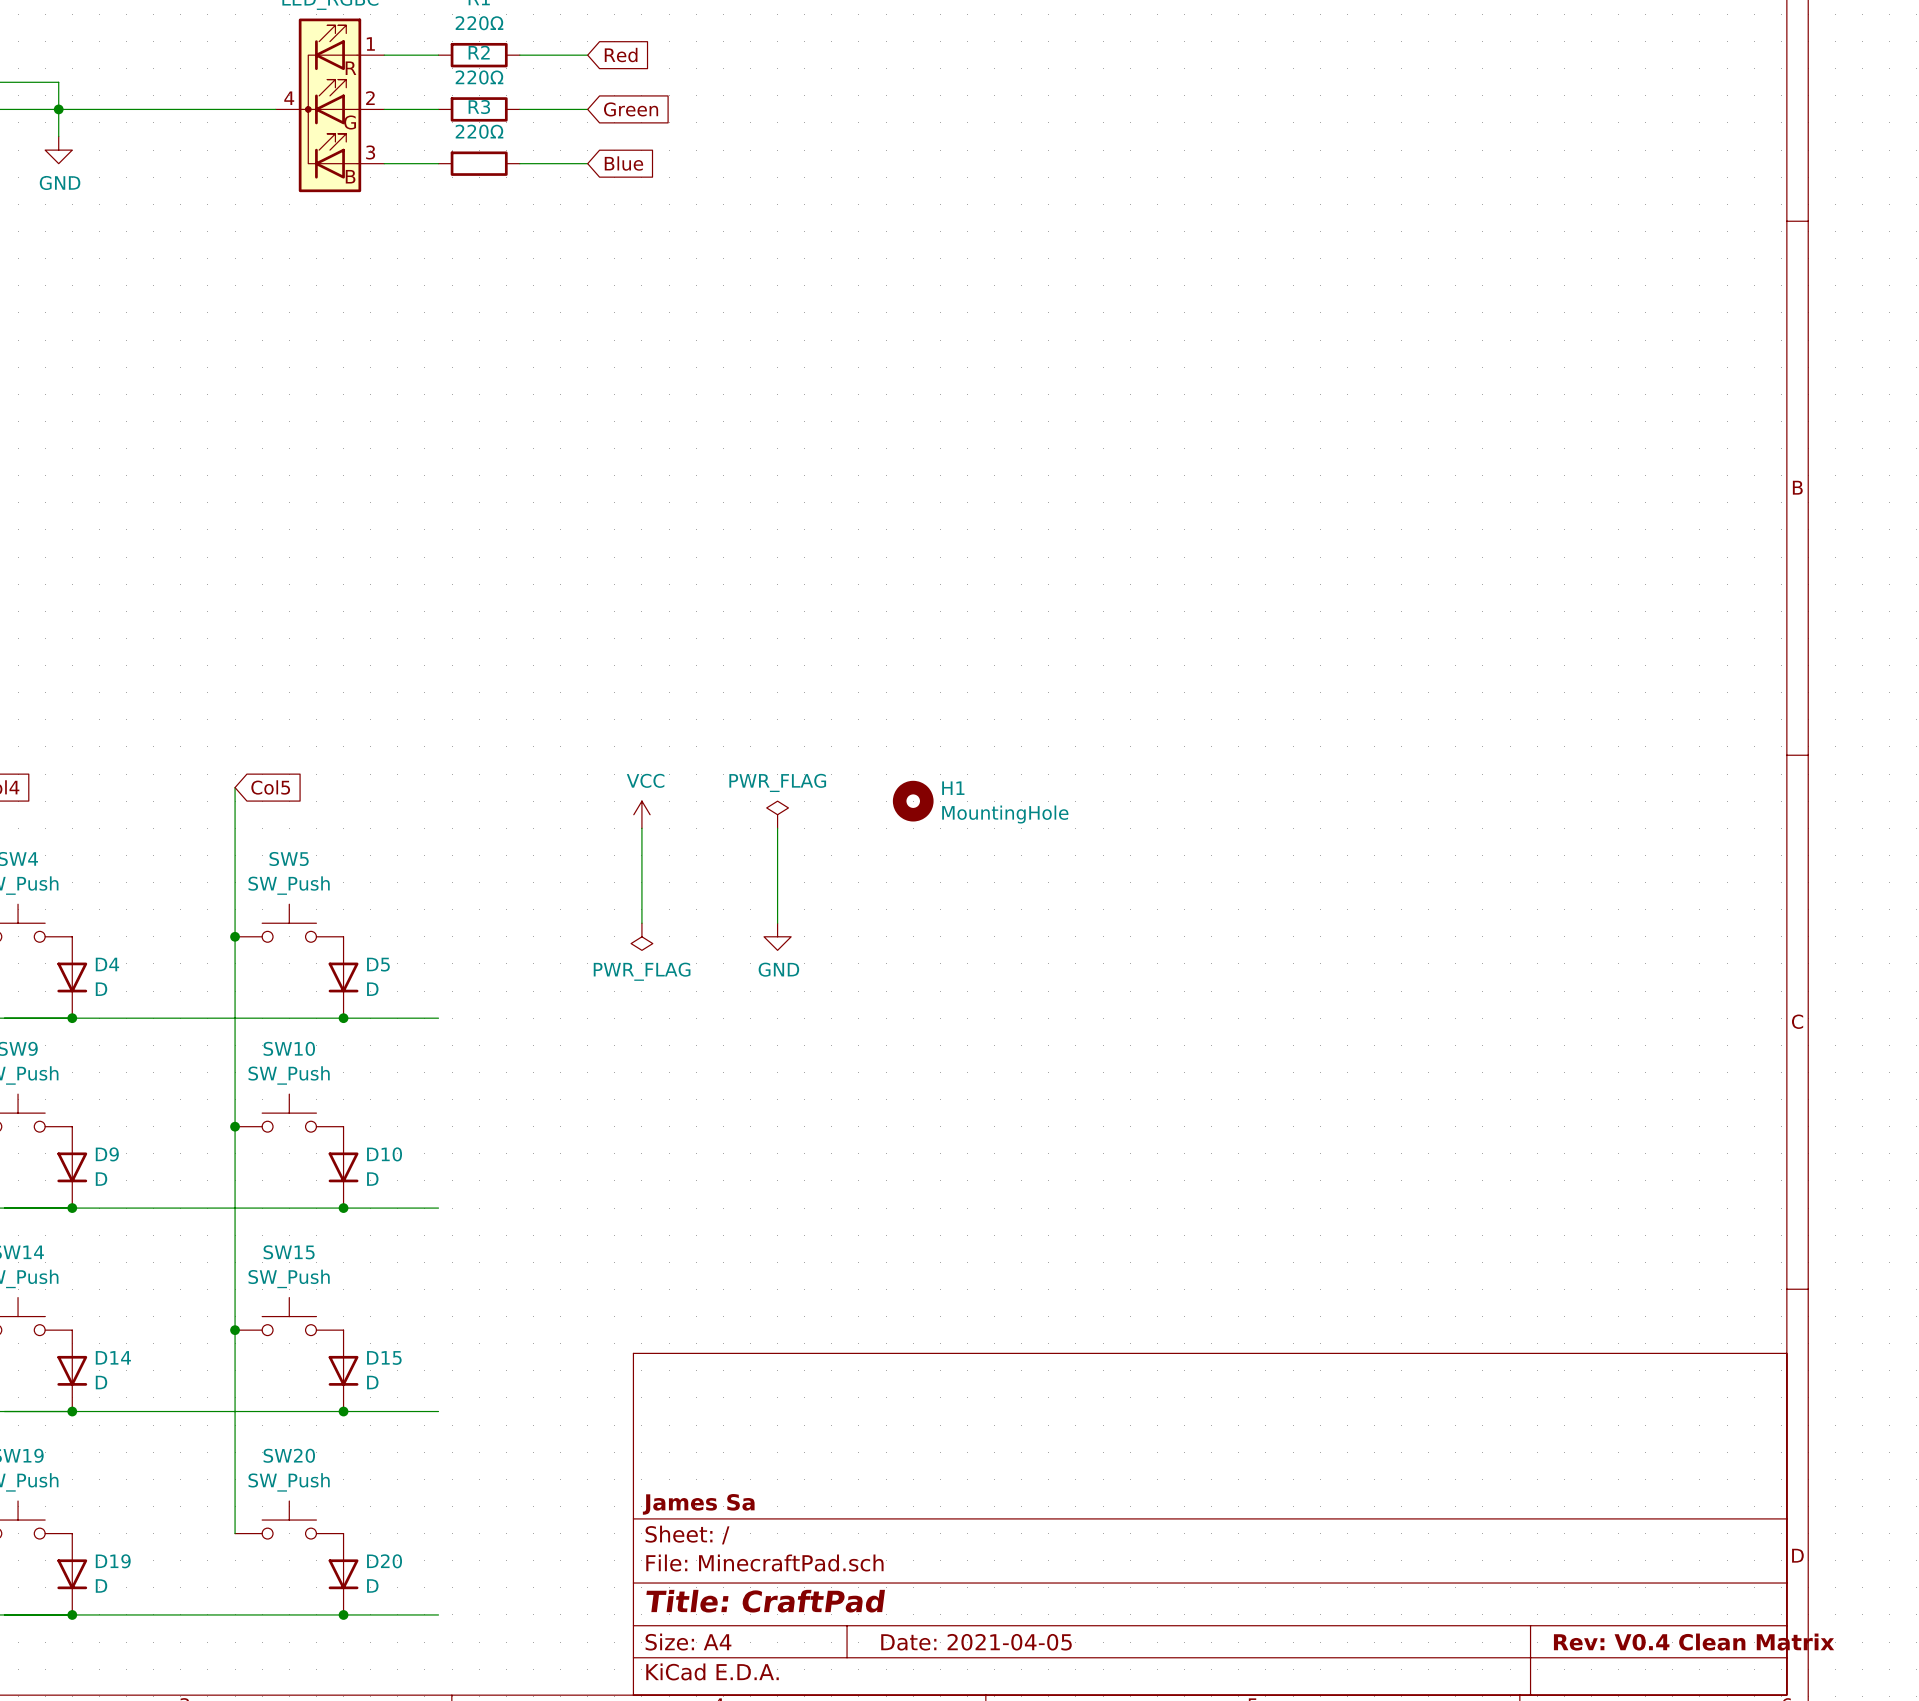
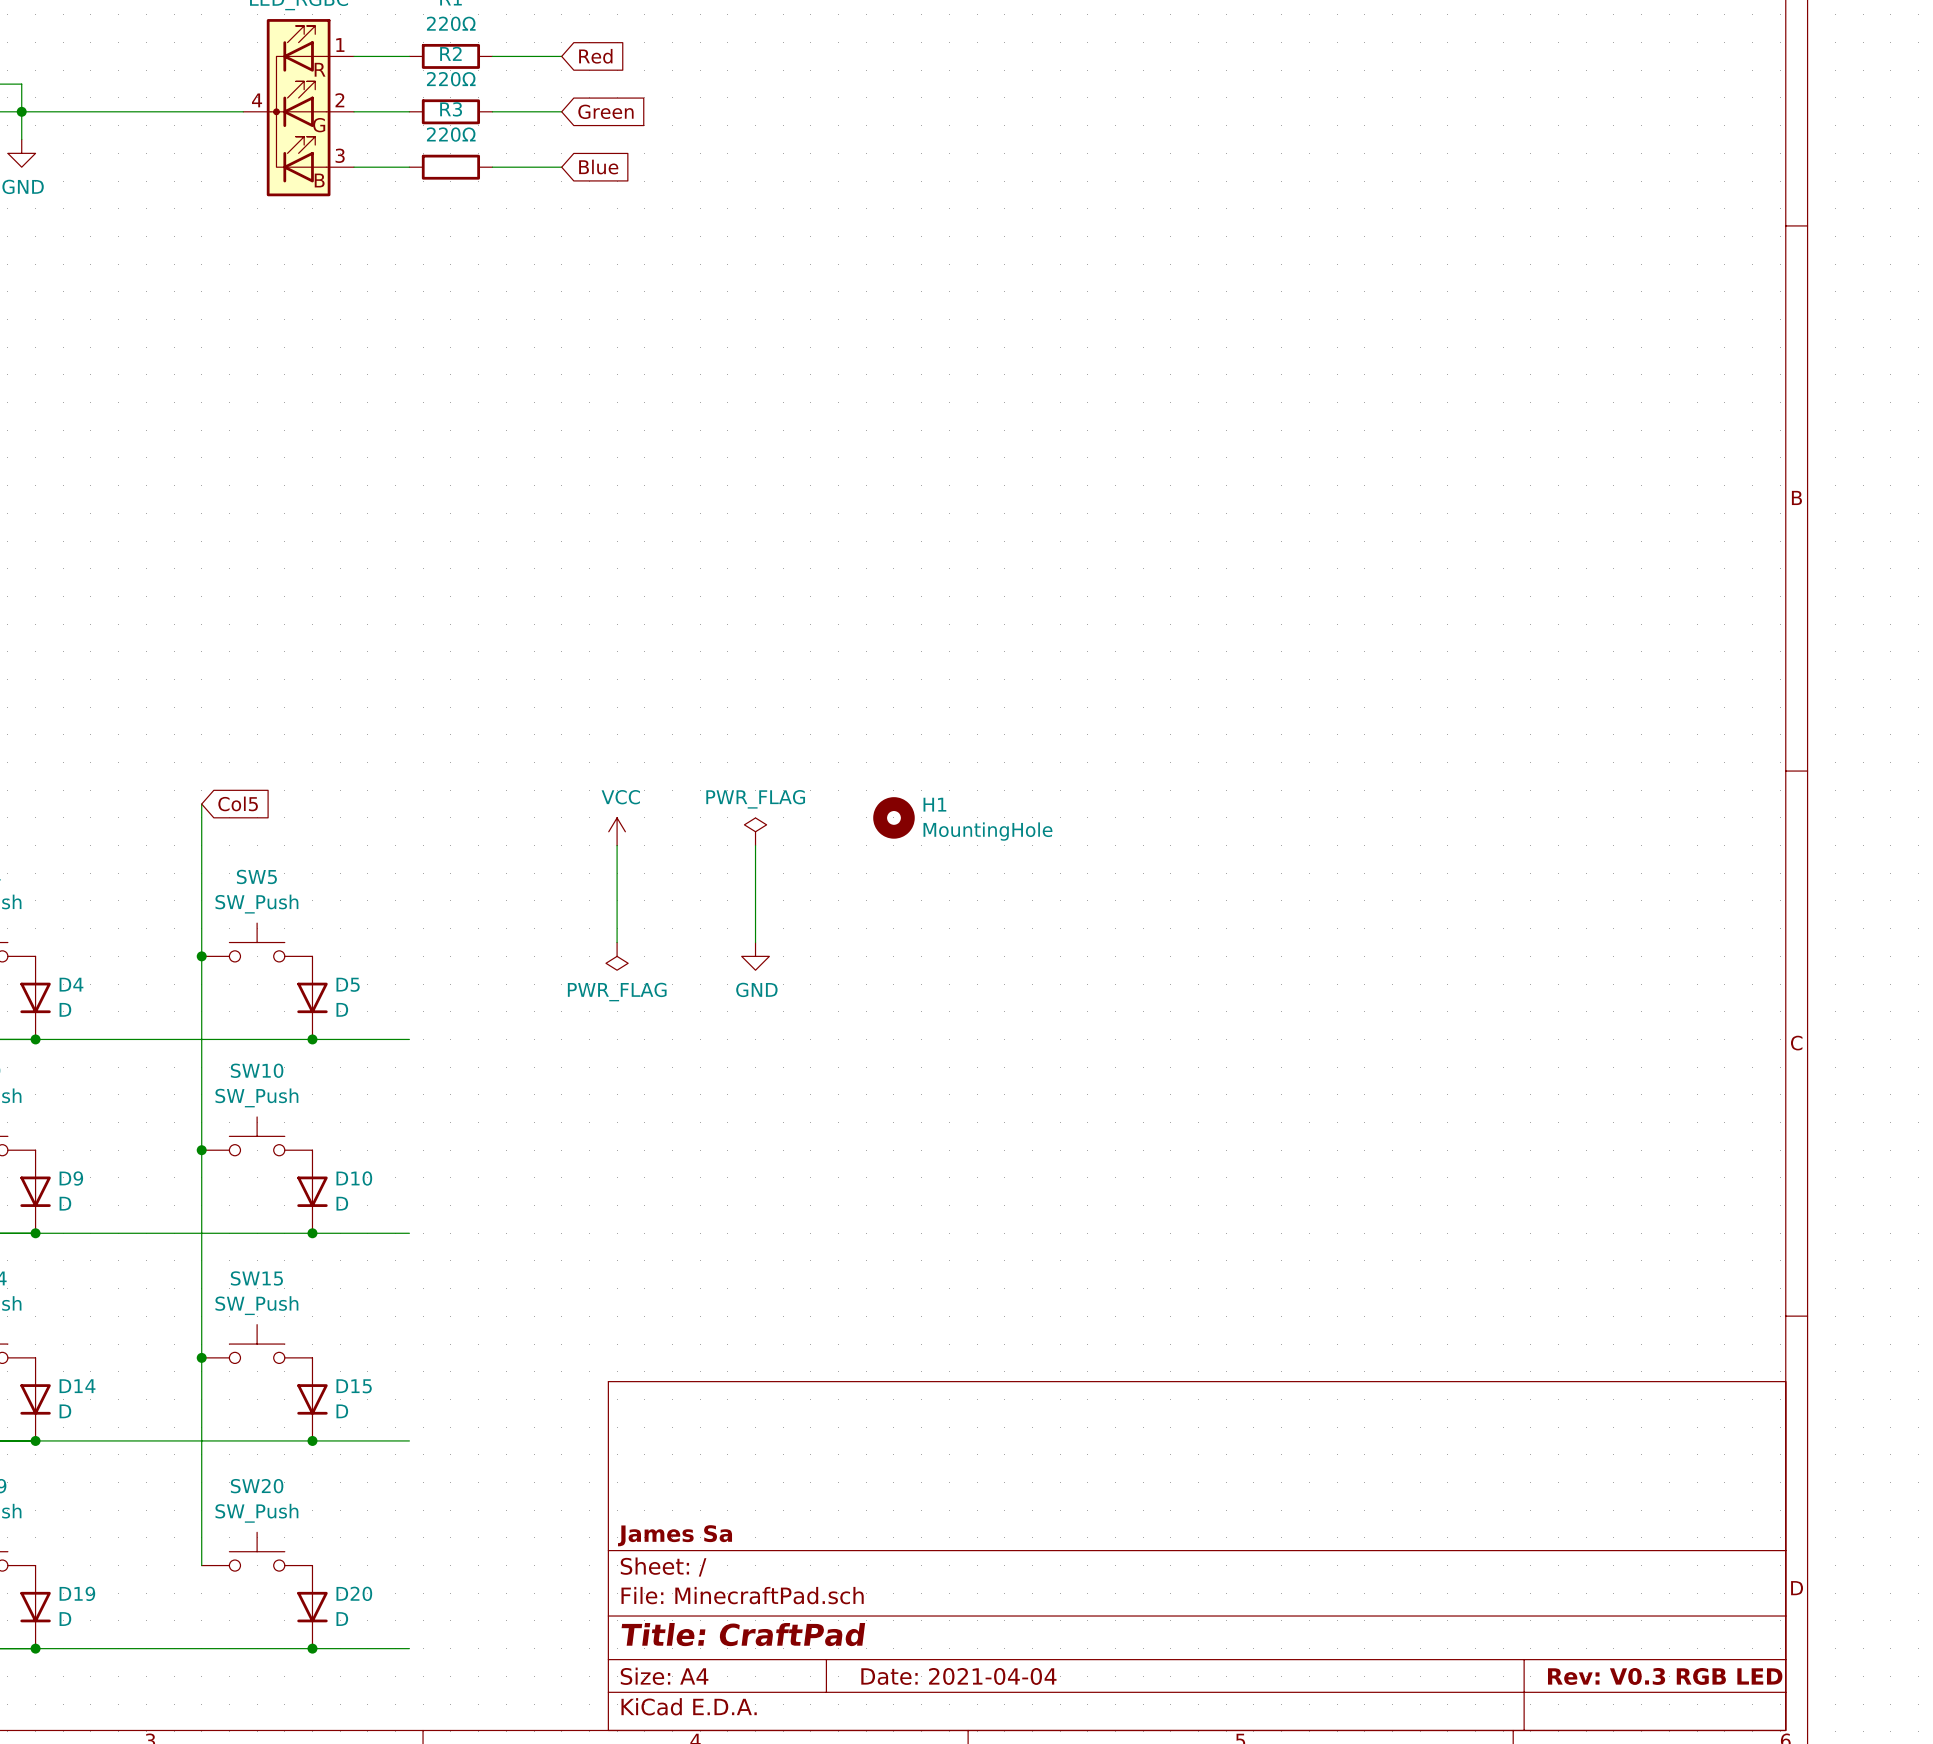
title block: Date: 2021-04-05 (976, 1642) -> Date: 2021-04-04 (958, 1676)
title block: Rev: V0.4 Clean Matrix (1694, 1642) -> Rev: V0.3 RGB LED (1665, 1676)

